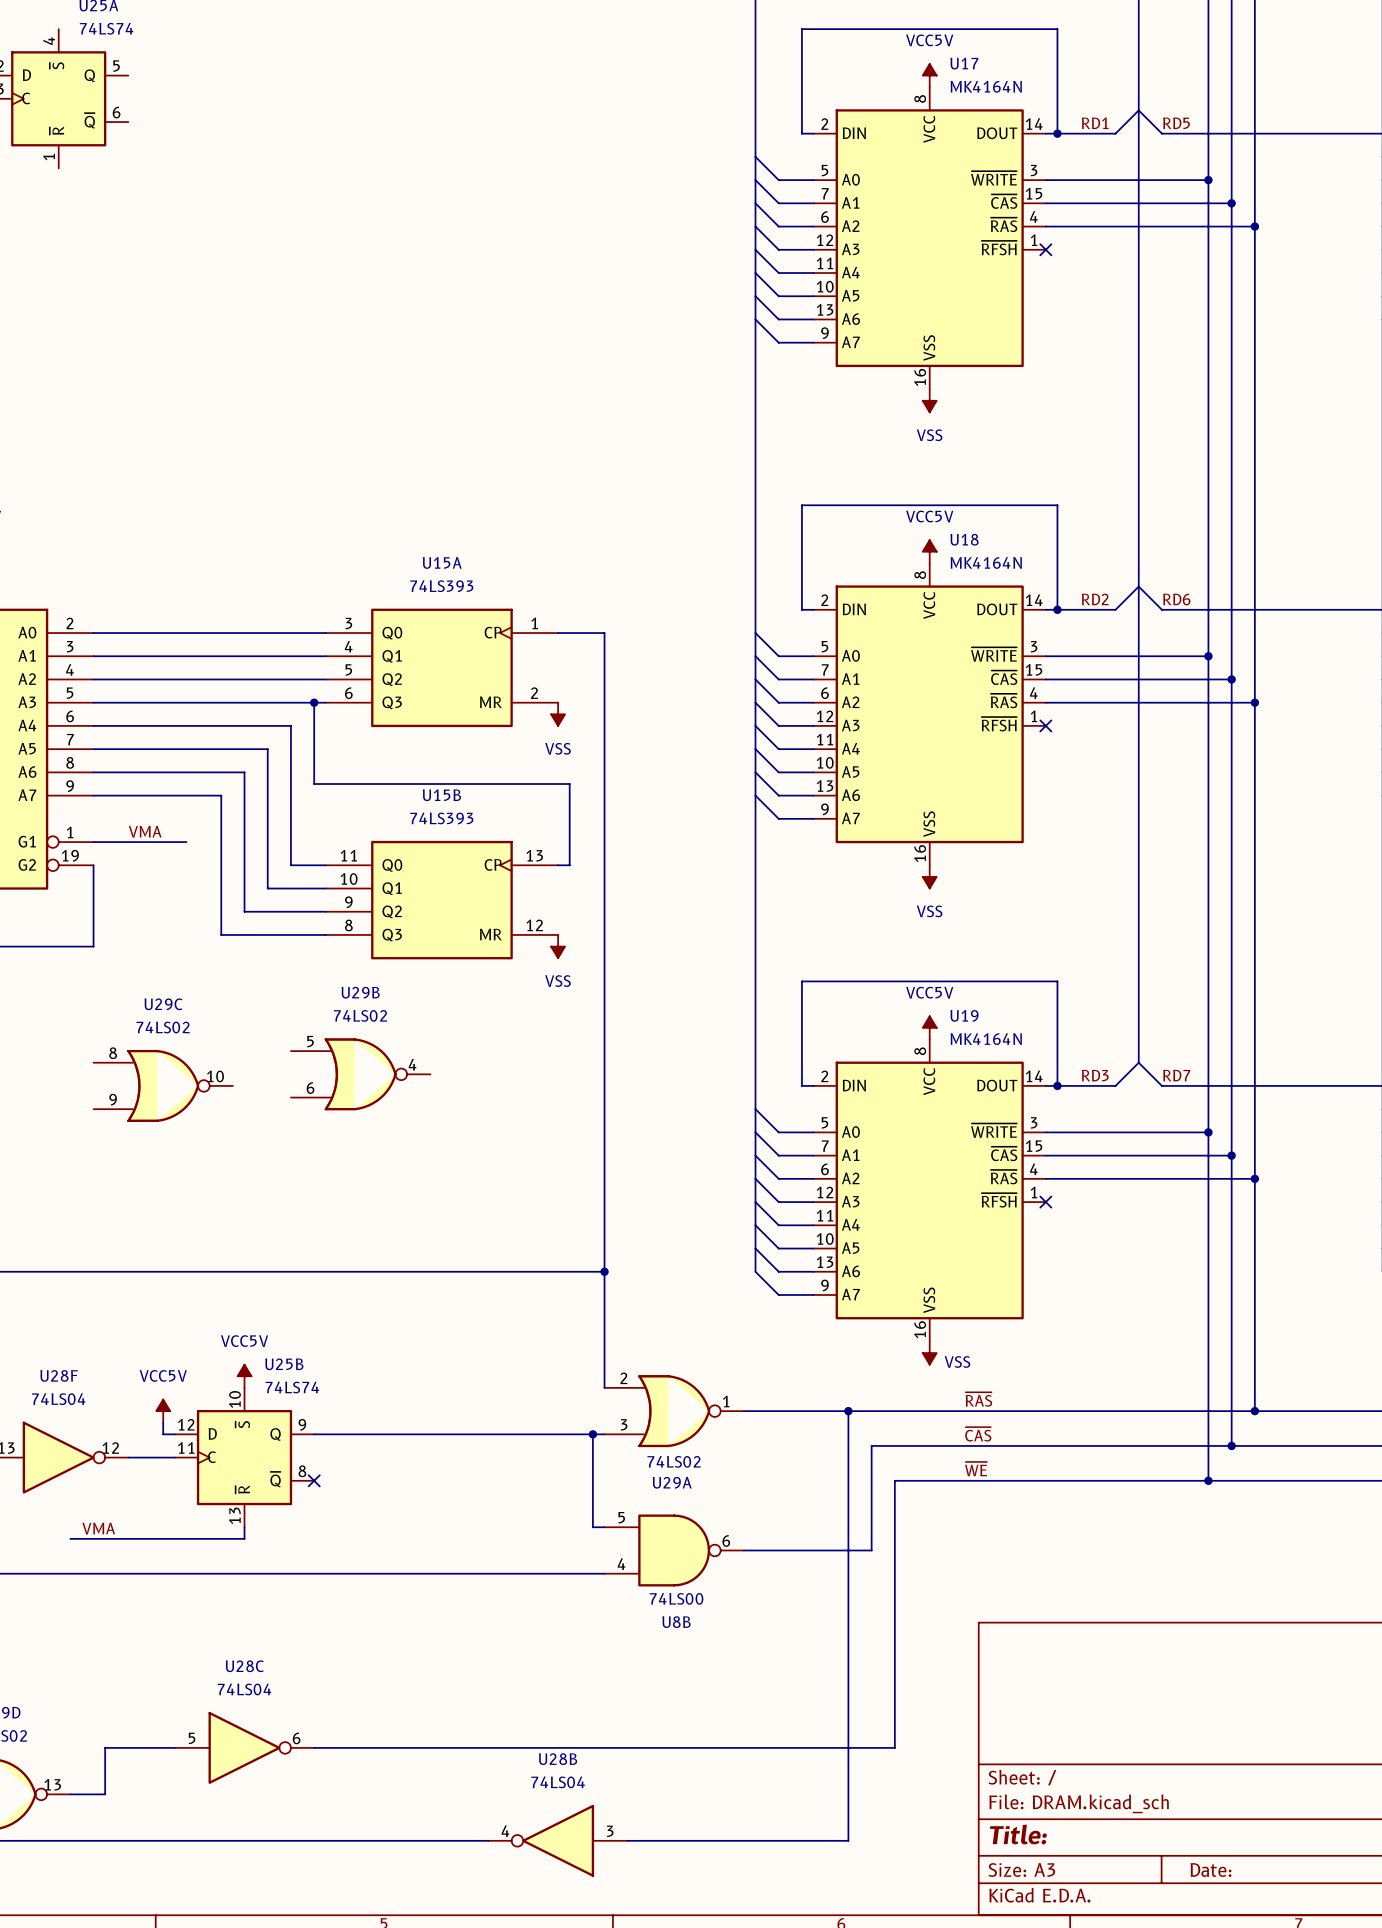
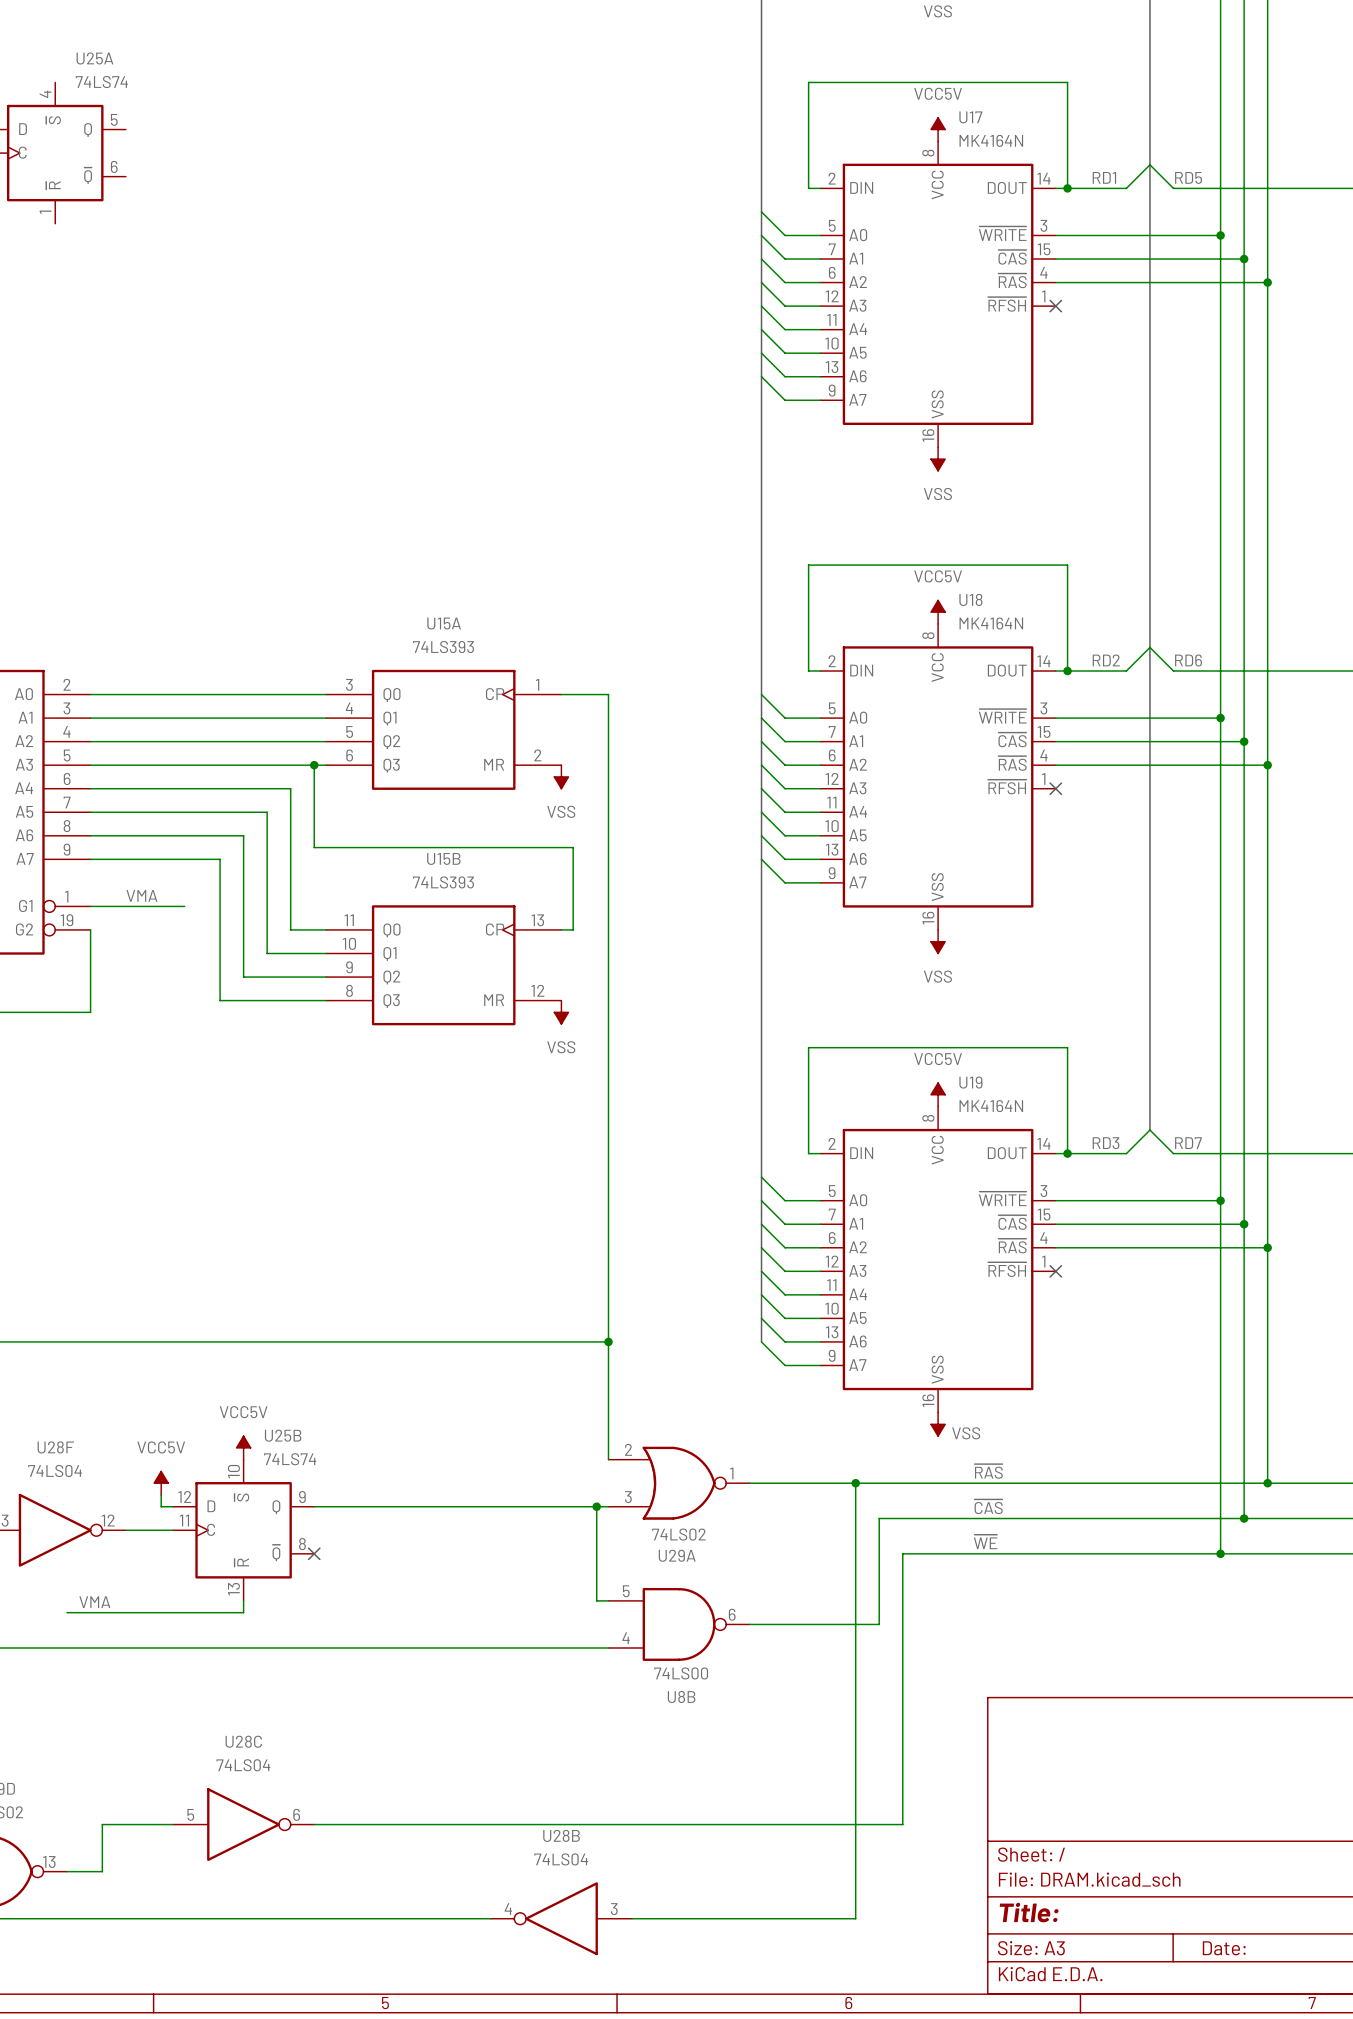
U29B: 74LS02 (360, 1074) -> none
U29C: 74LS02 (163, 1085) -> none

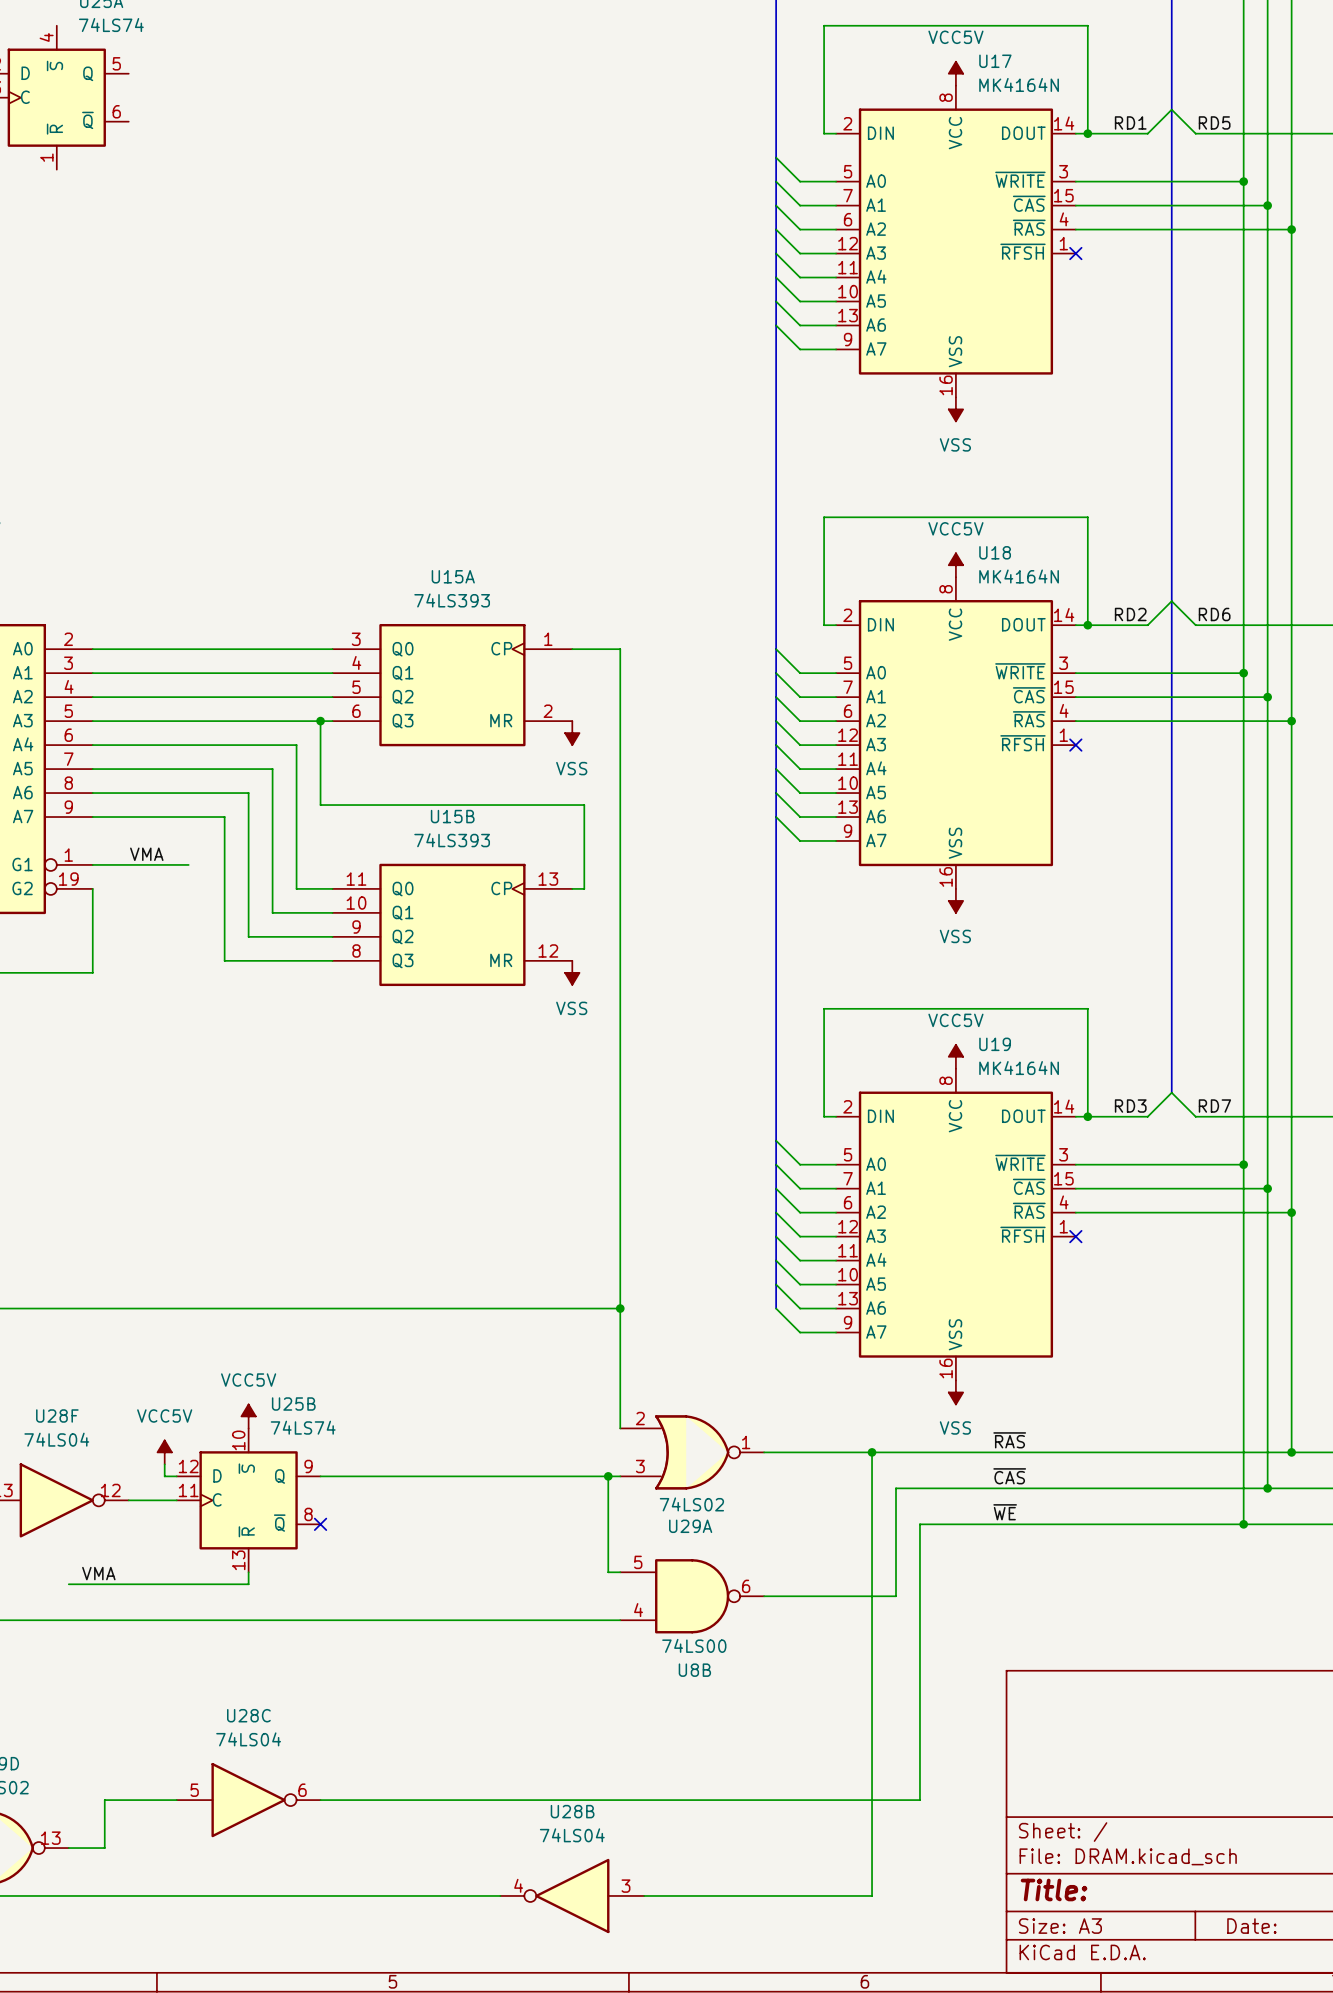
power symbol text position: VSS (966, 1433) -> VSS (955, 1427)

